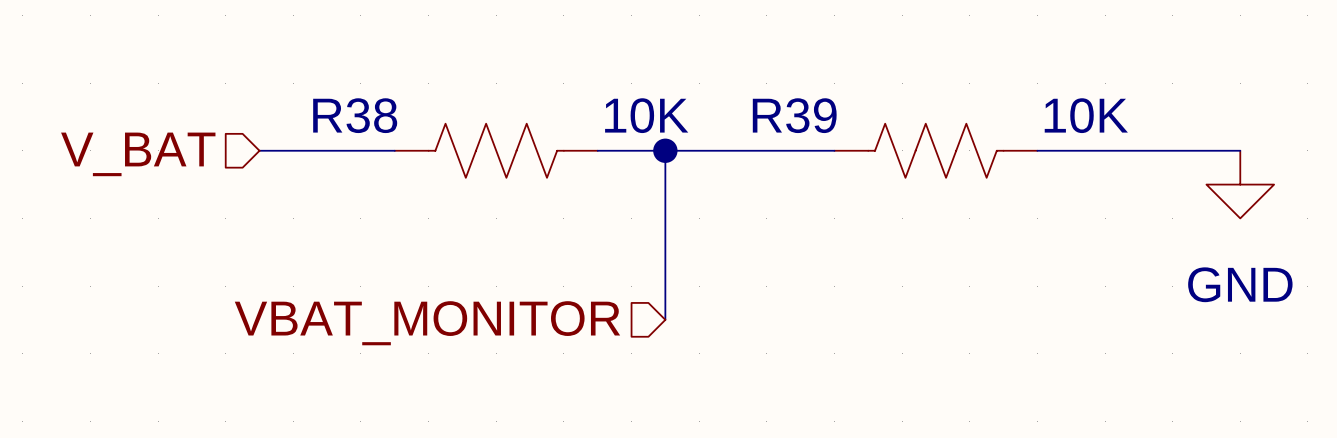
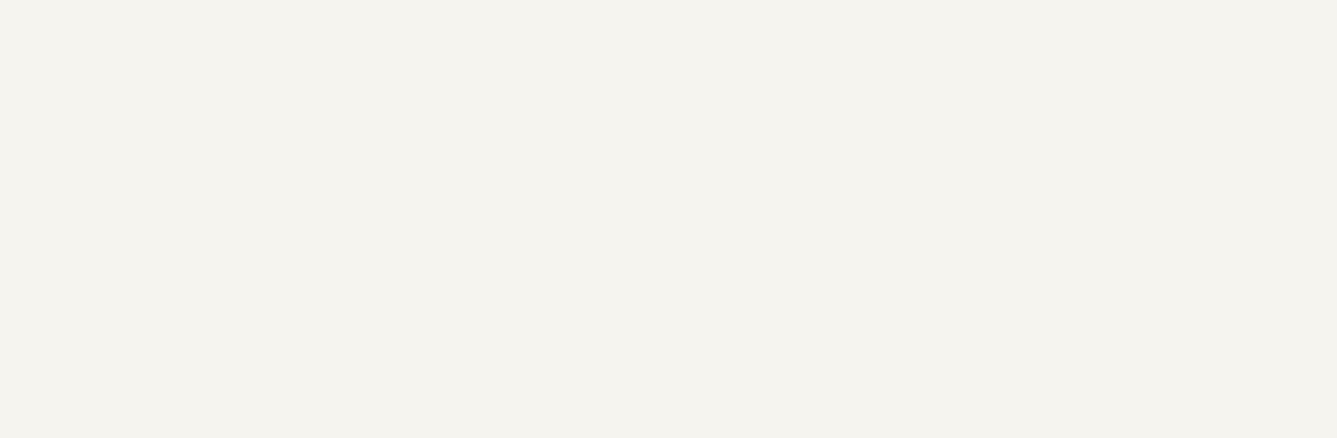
wire: (259, 150) (394, 150) -> none
R38: 10K (496, 150) -> none
wire: (597, 150) (834, 150) -> none
wire: (665, 150) (665, 319) -> none
junction: (665, 150) -> none
R39: 10K (935, 150) -> none
wire: (1037, 150) (1240, 150) -> none
hierarchical label: V_BAT (138, 154) -> none
power symbol: GND (1240, 184) -> none
hierarchical label: VBAT_MONITOR (427, 323) -> none

